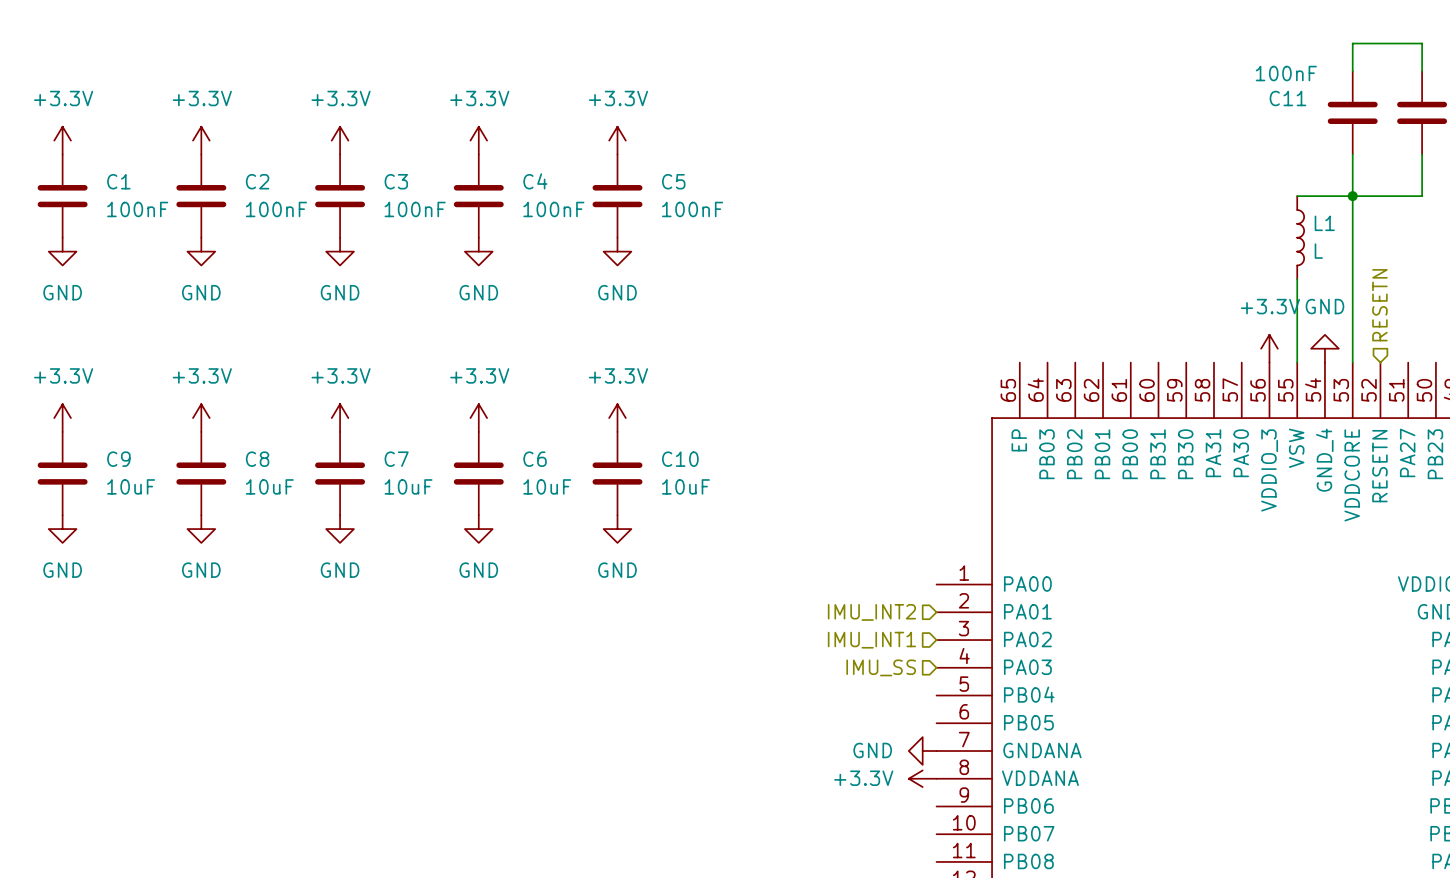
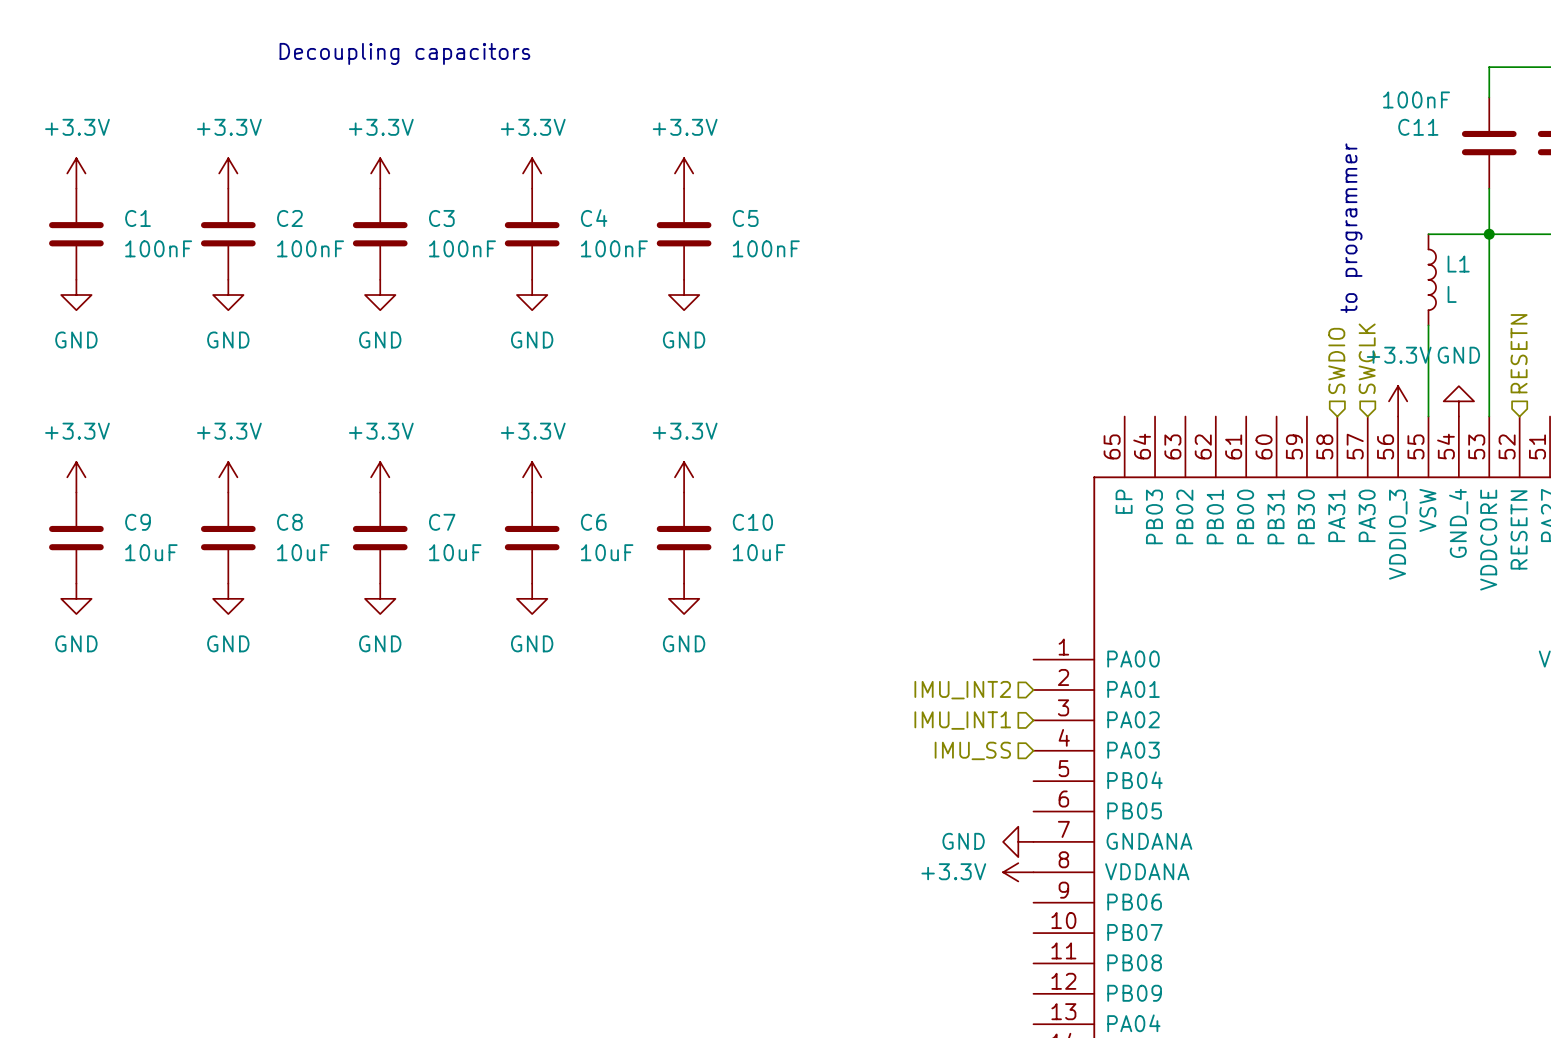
text: none -> Decoupling capacitors (404, 53)
text: none -> to programmer (1351, 228)
hierarchical label: none -> SWCLK (1367, 358)
hierarchical label: none -> SWDIO (1336, 360)

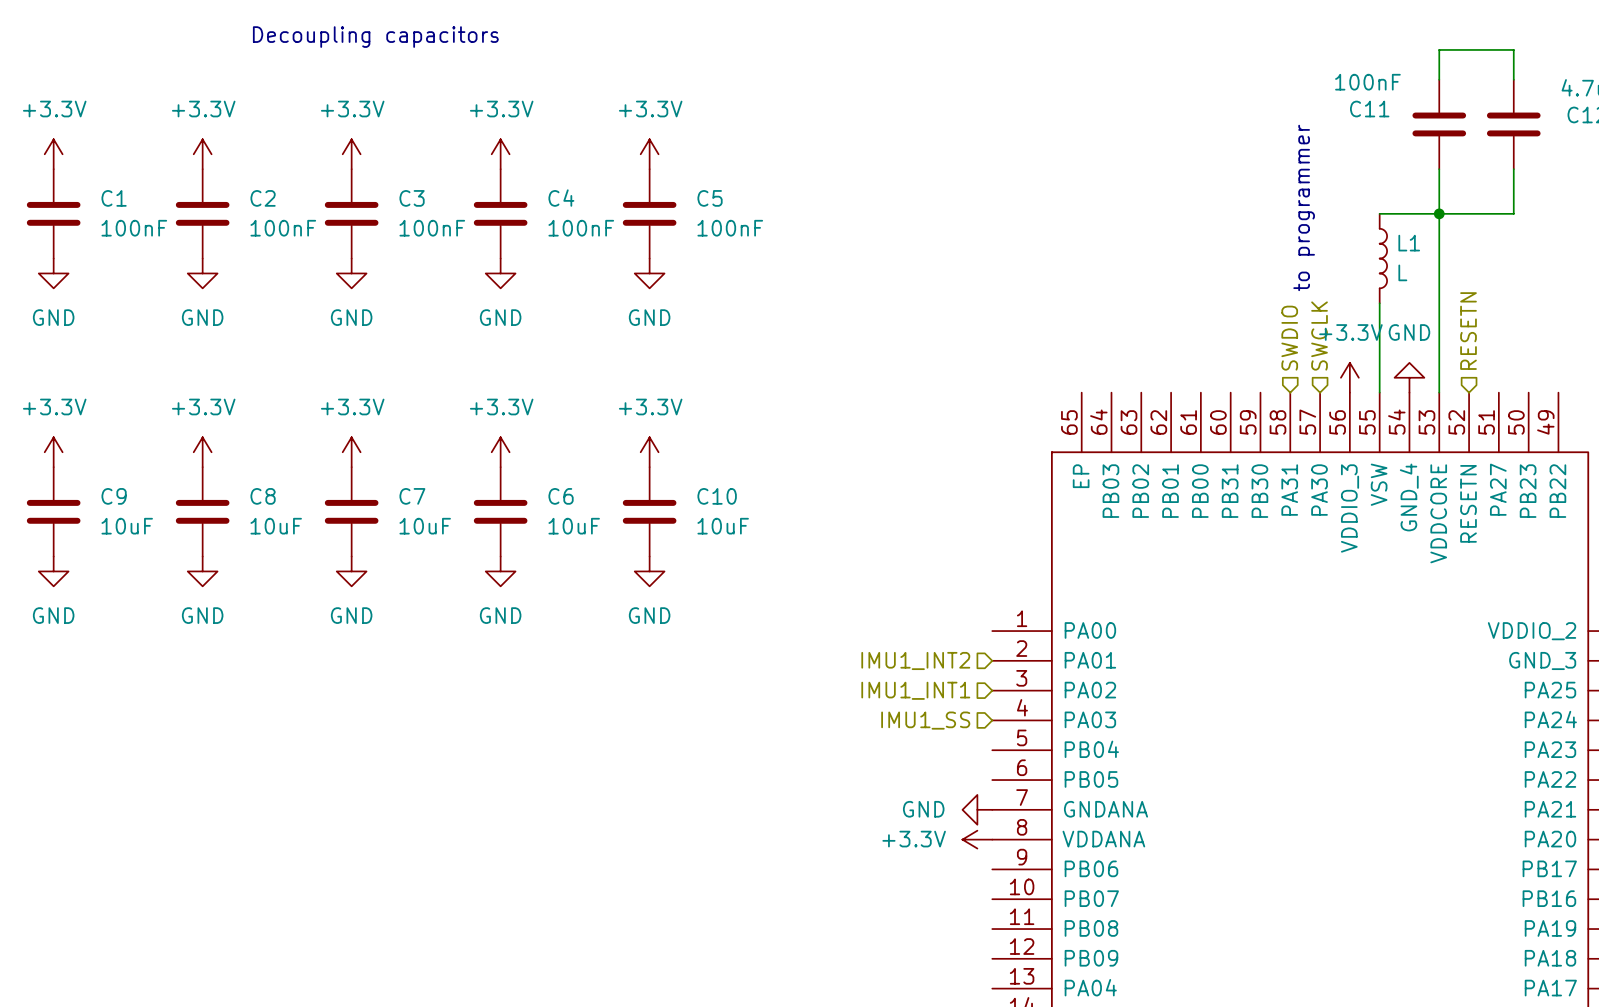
hierarchical label: IMU_INT2 (962, 690) -> IMU1_INT2 (915, 660)
hierarchical label: IMU_INT1 (962, 720) -> IMU1_INT1 (915, 690)
hierarchical label: IMU_SS (972, 750) -> IMU1_SS (925, 720)

